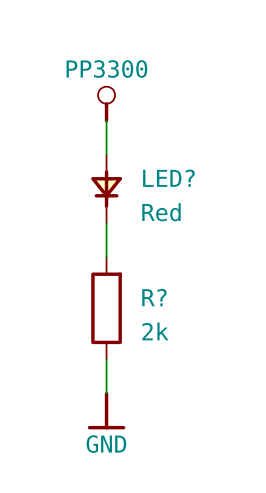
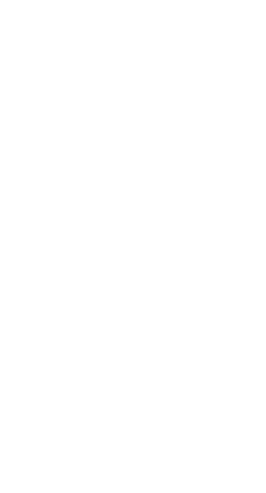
power symbol: PP3300 (106, 104) -> none
wire: (106, 120) (106, 154) -> none
LED?: Red (106, 188) -> none
wire: (106, 223) (106, 257) -> none
R?: 2k (106, 308) -> none
wire: (106, 359) (106, 393) -> none
power symbol: GND (106, 410) -> none

